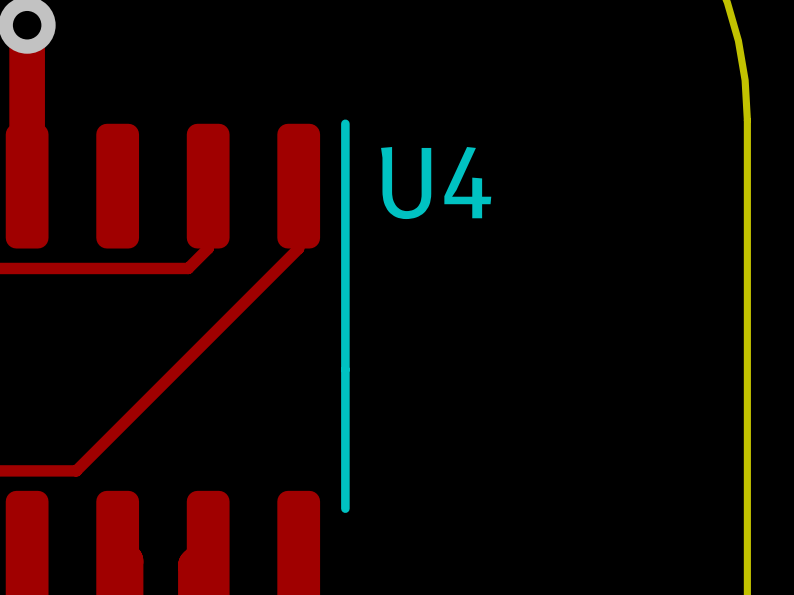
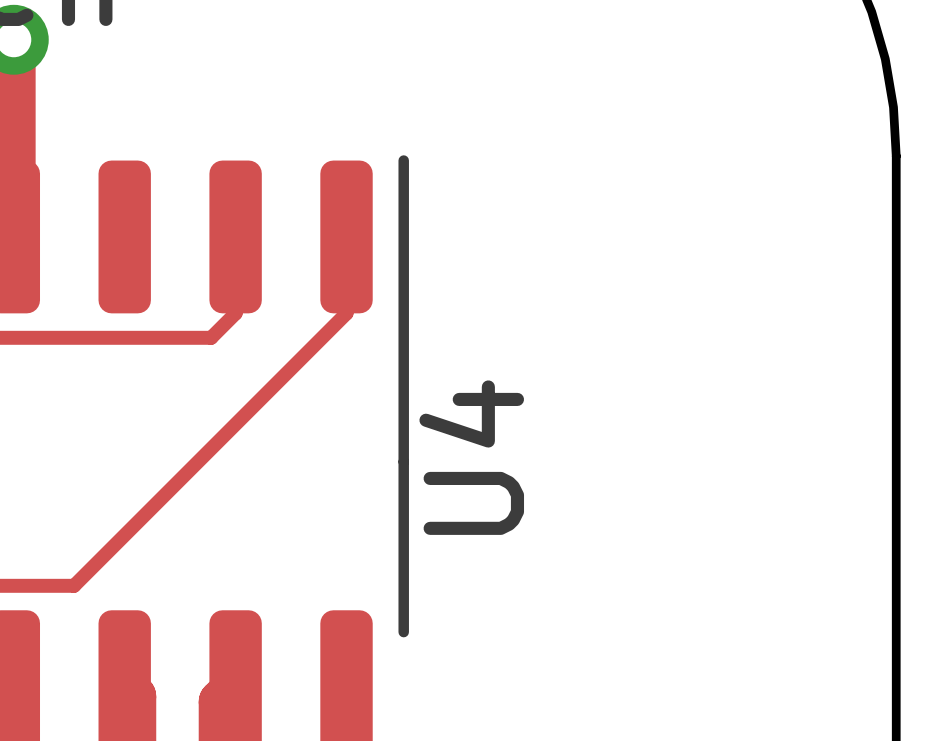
U4 name rotation: 0° (436, 183) -> 90° counterclockwise (471, 457)
U4 name position: U4 (436, 183) -> U4 (471, 457)

